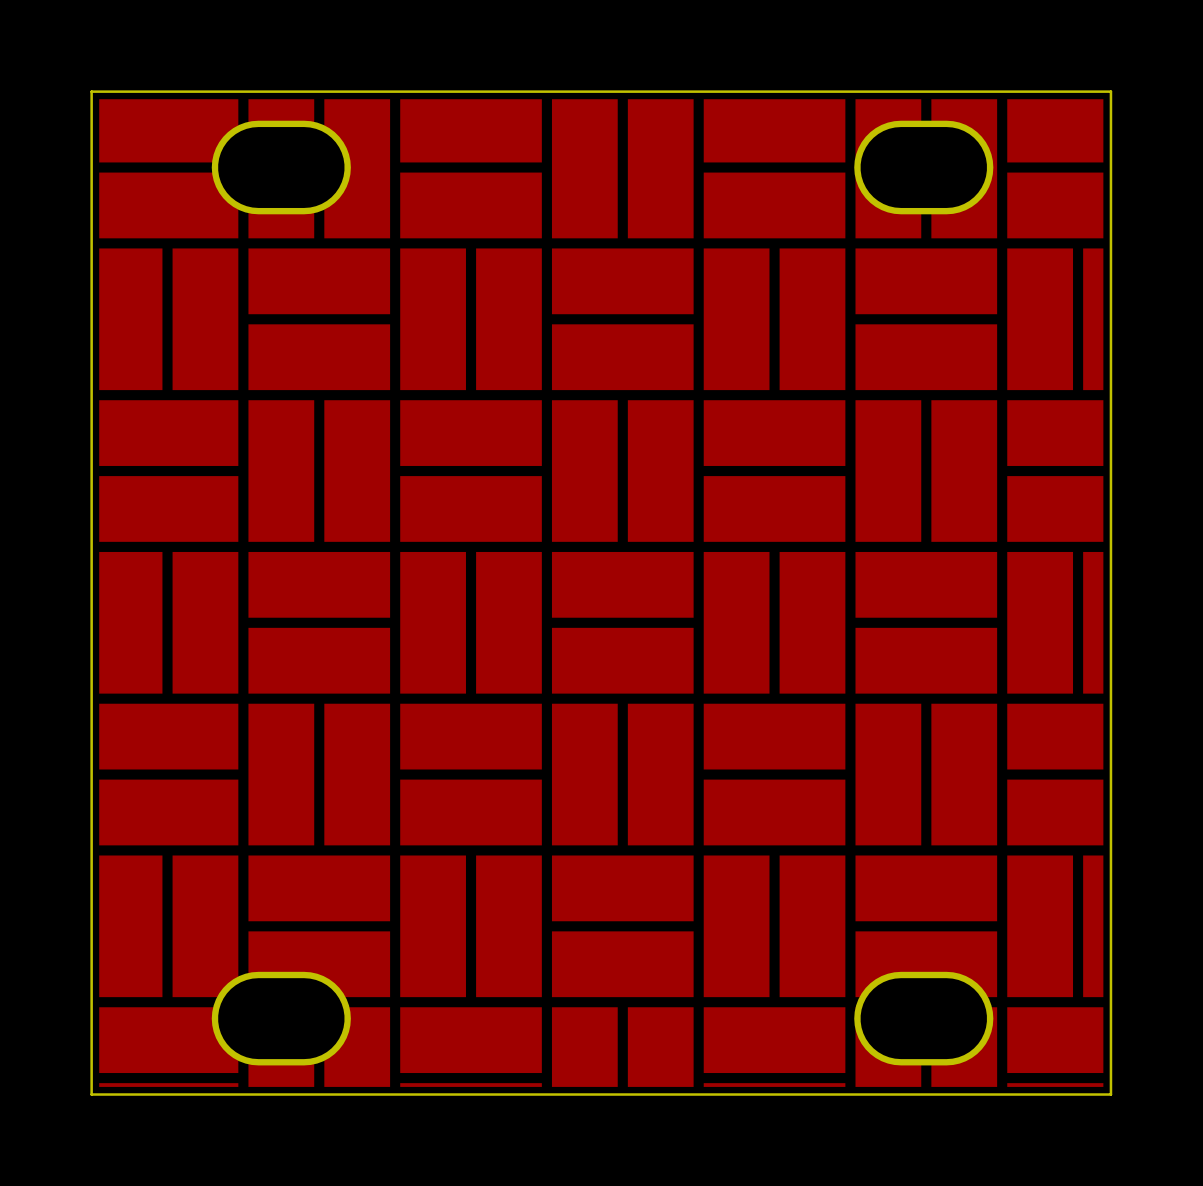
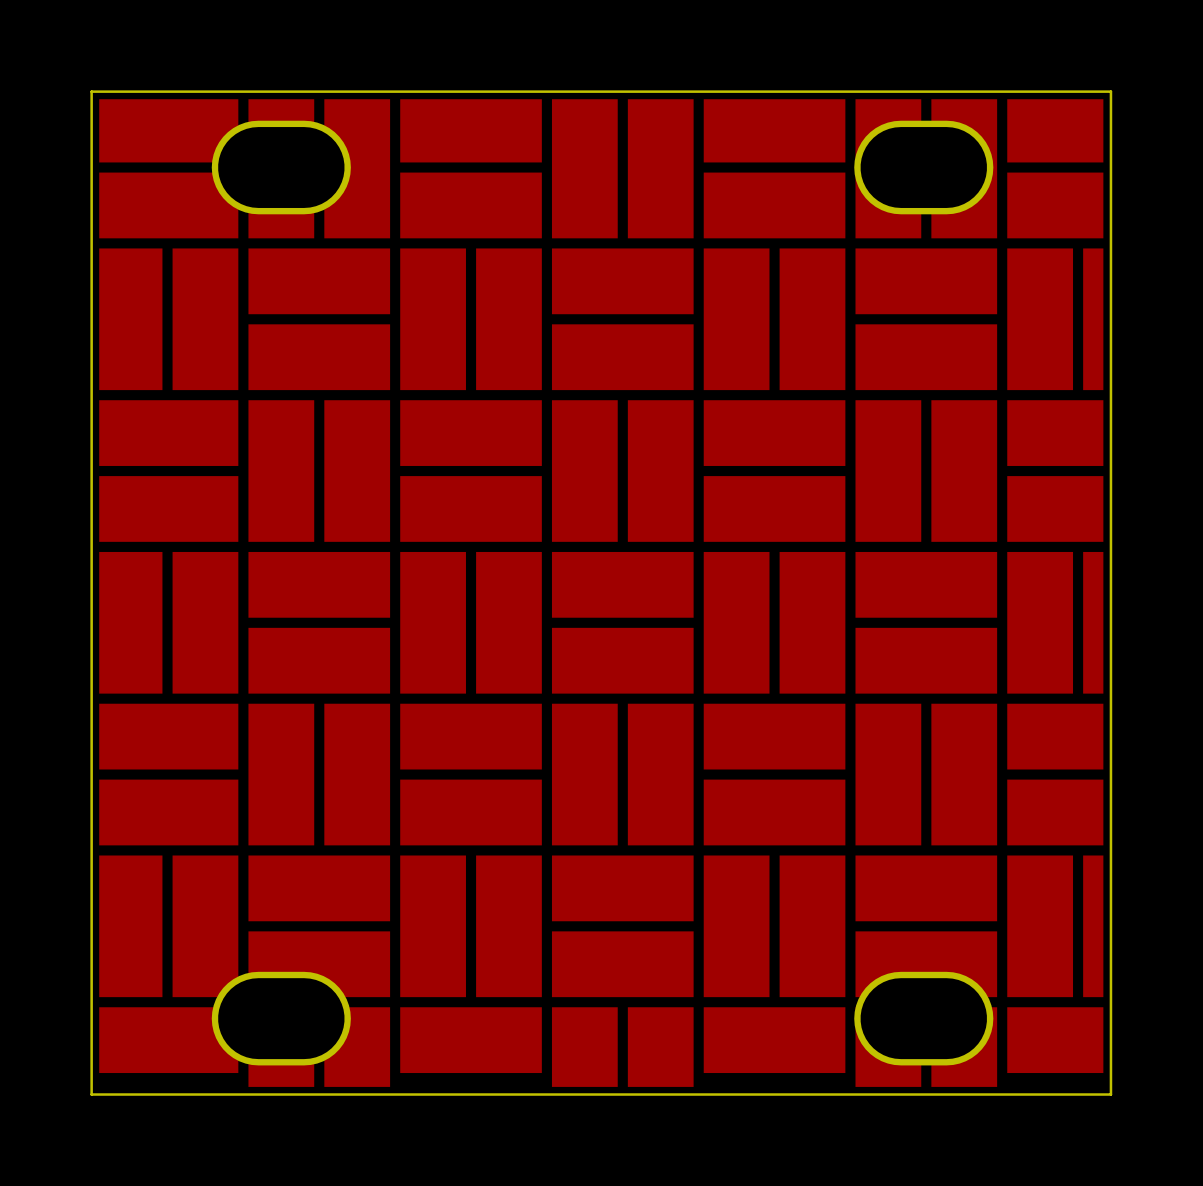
drawing: [99, 1083, 239, 1087] -> none
drawing: [400, 1083, 542, 1087] -> none
drawing: [703, 1083, 846, 1087] -> none
drawing: [1007, 1083, 1104, 1087] -> none

